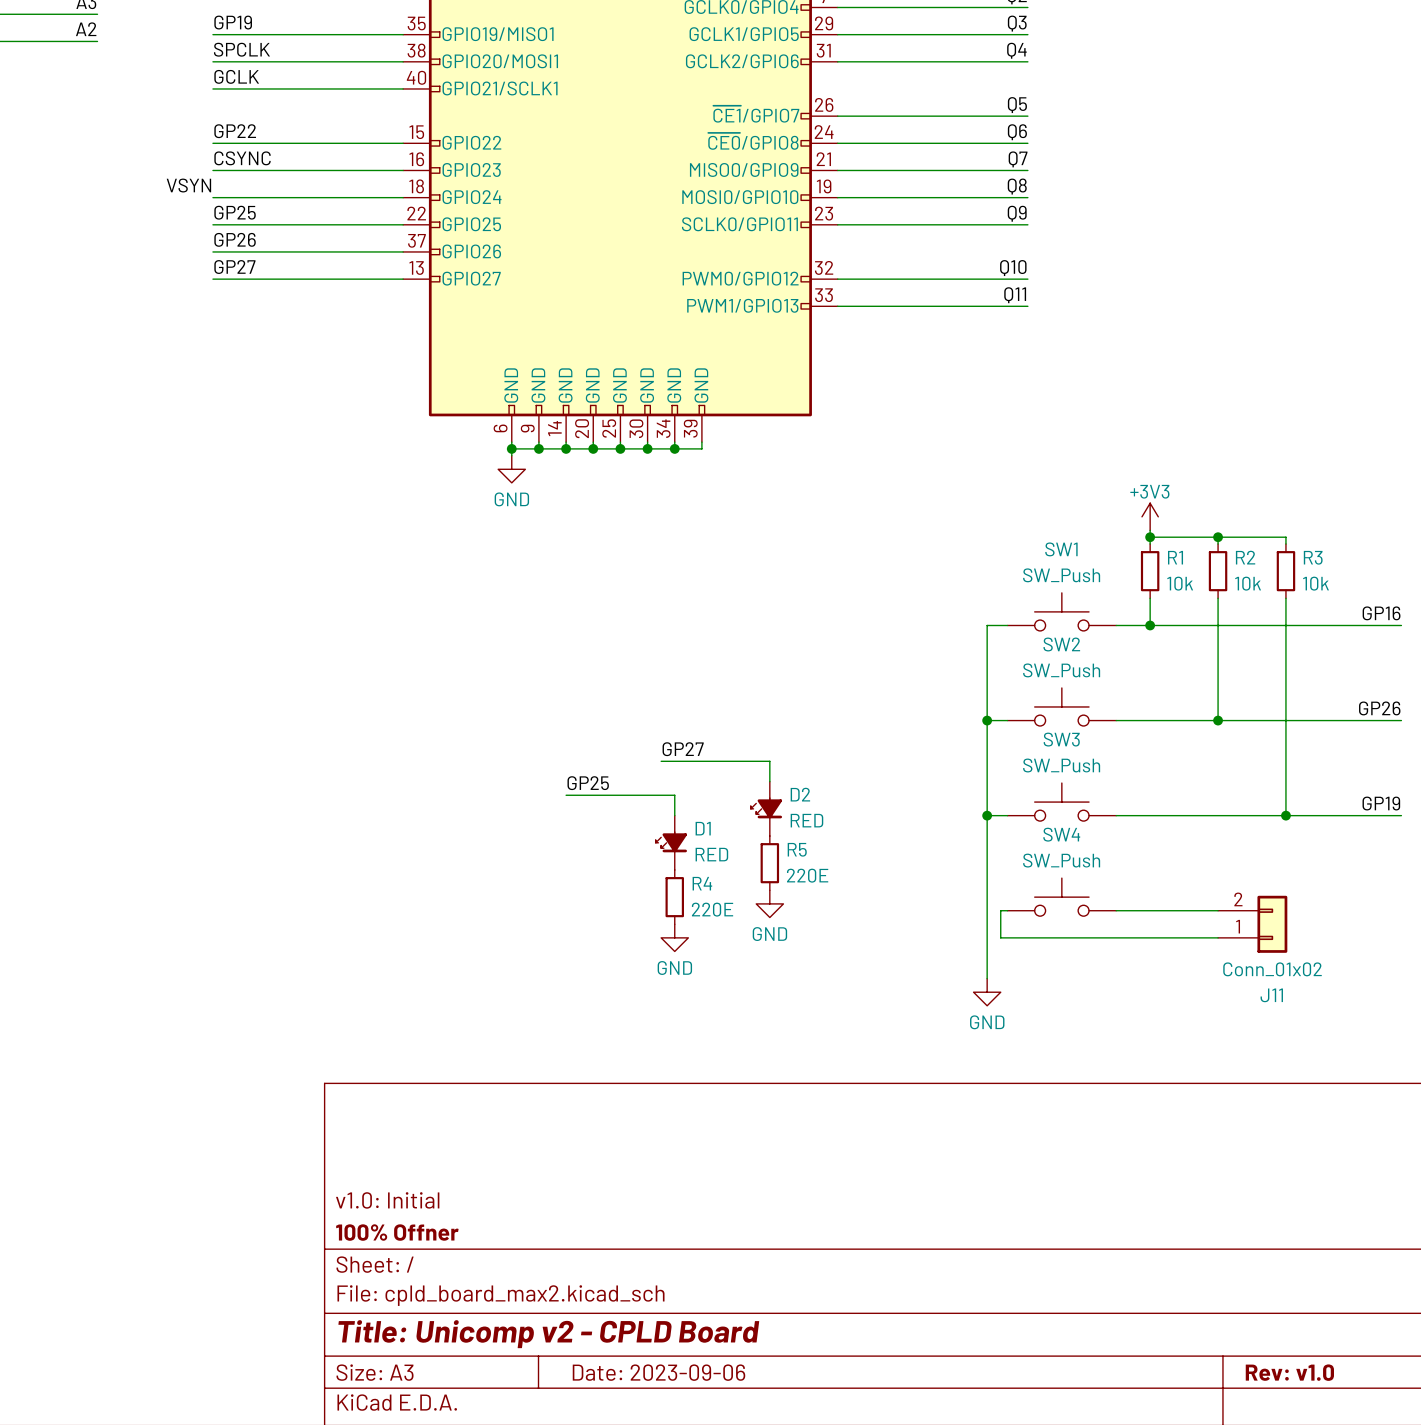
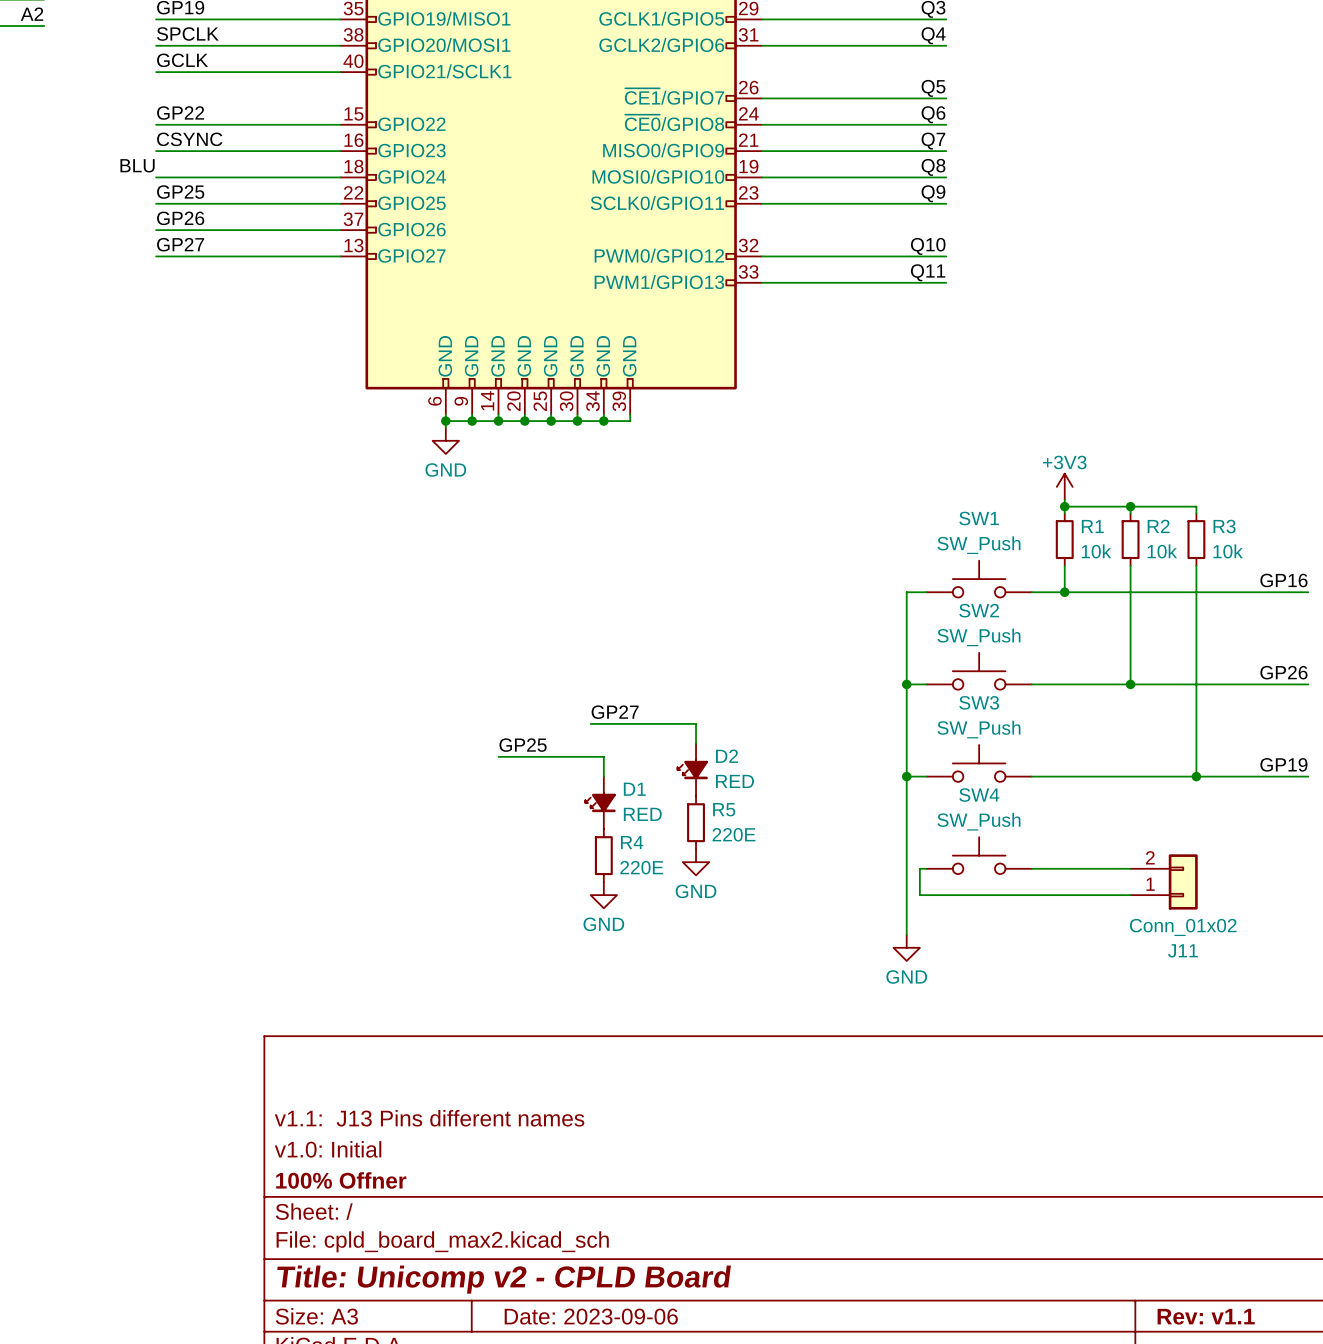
label: VSYN (188, 185) -> BLU (137, 165)
title block: none -> v1.1: J13 Pins different names (429, 1118)
title block: Rev: v1.0 (1289, 1372) -> Rev: v1.1 (1206, 1316)

